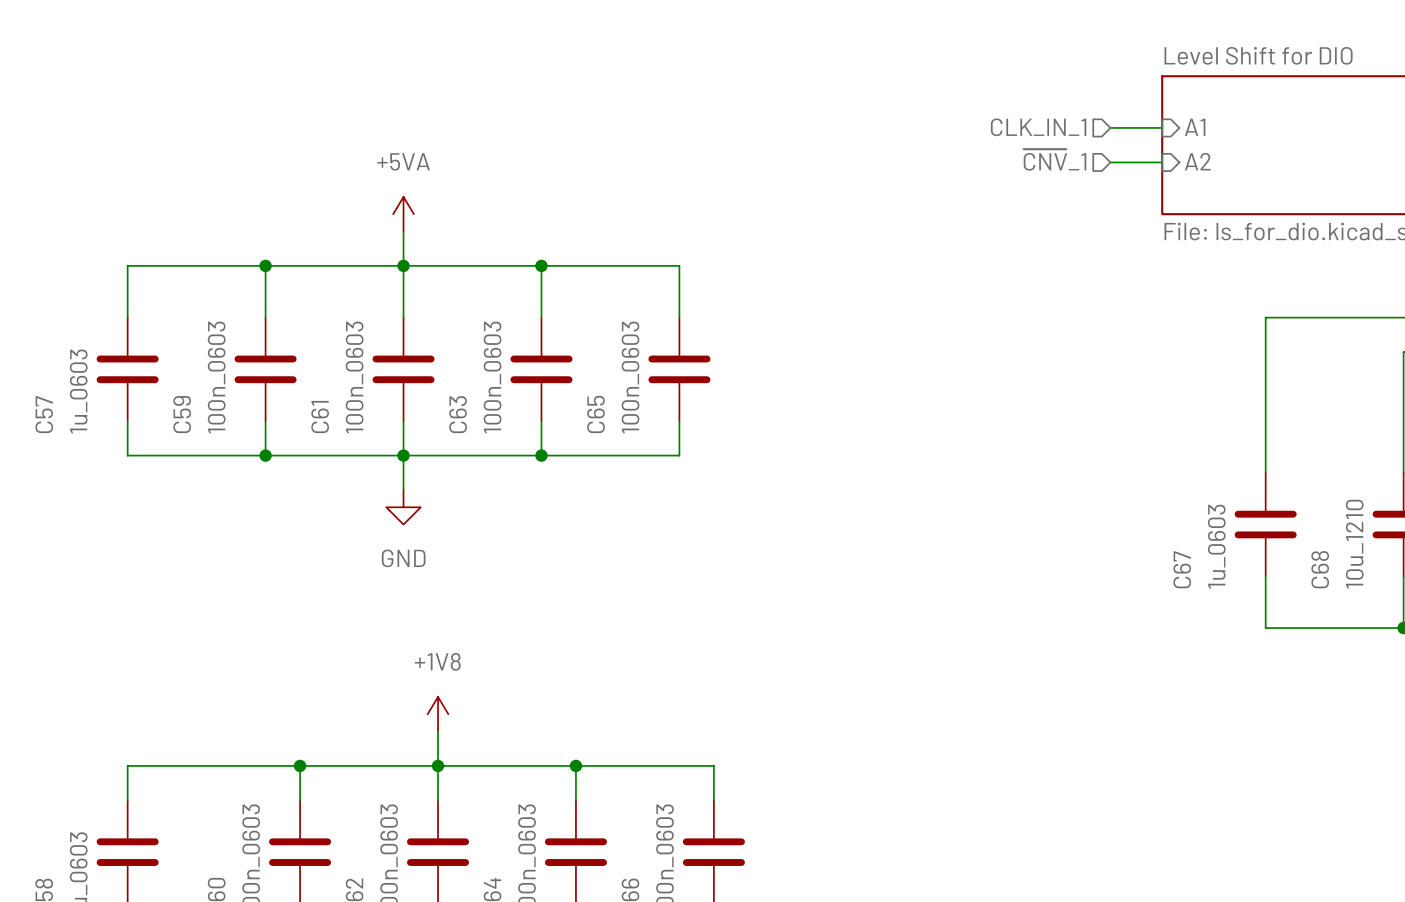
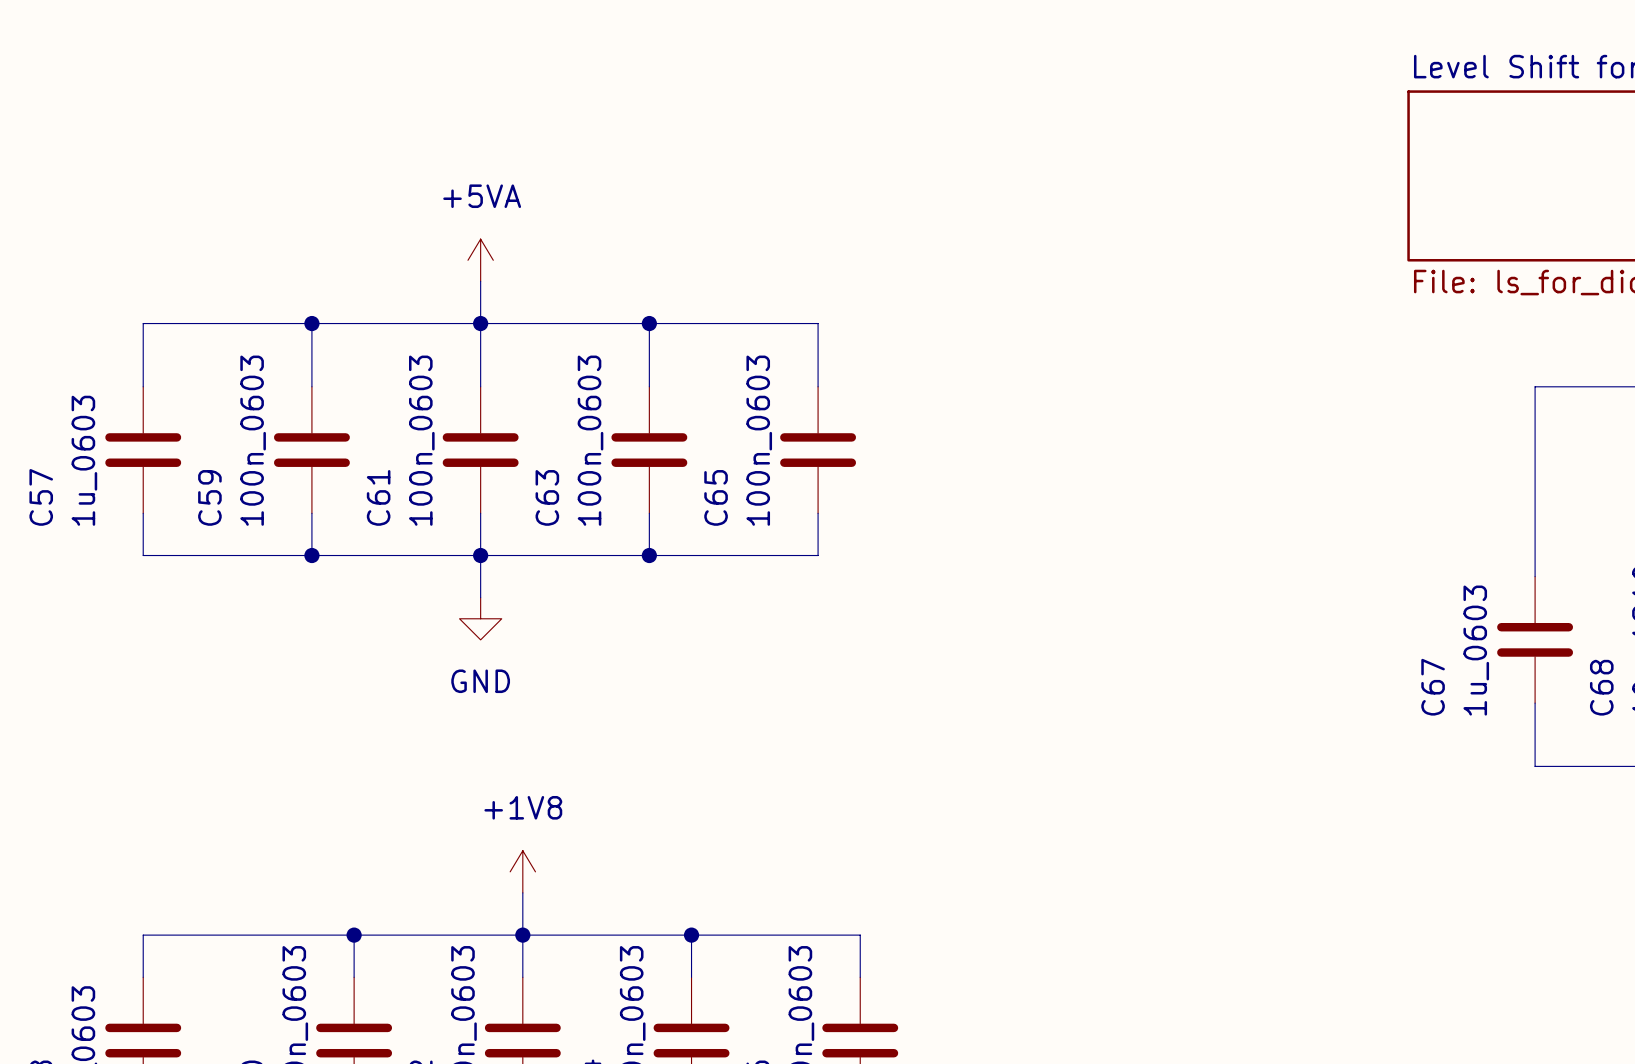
hierarchical label: CLK_IN_1 (1038, 127) -> none
wire: (1110, 127) (1162, 127) -> none
sheet pin: A1 (1195, 127) -> none
hierarchical label: ~{CNV}_1 (1054, 159) -> none
sheet pin: A2 (1197, 161) -> none
wire: (1110, 162) (1162, 162) -> none

